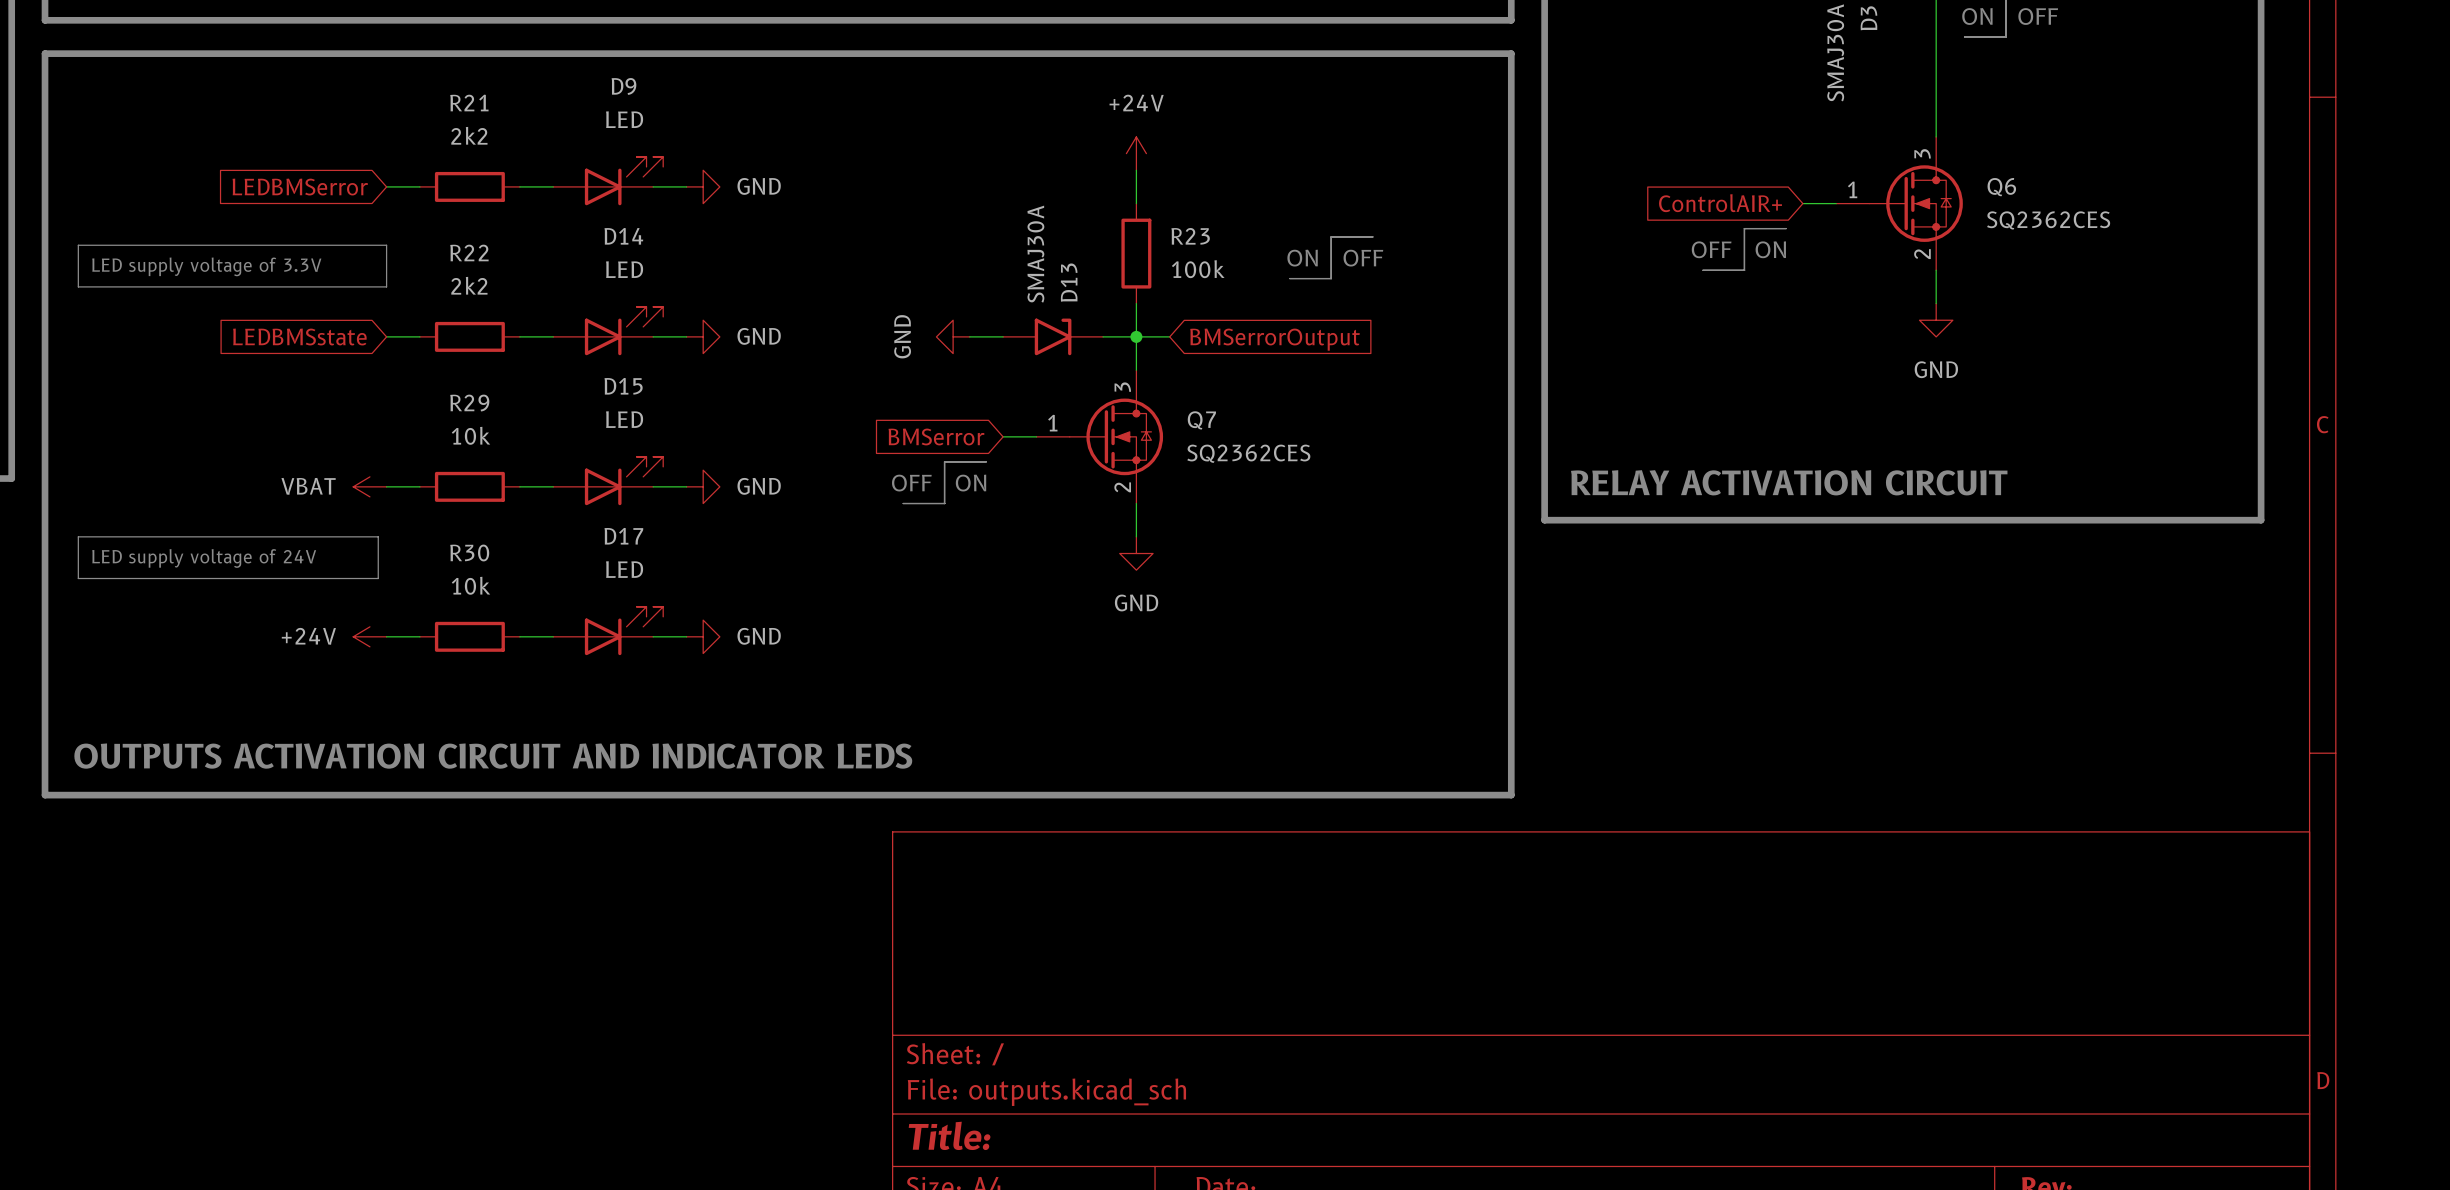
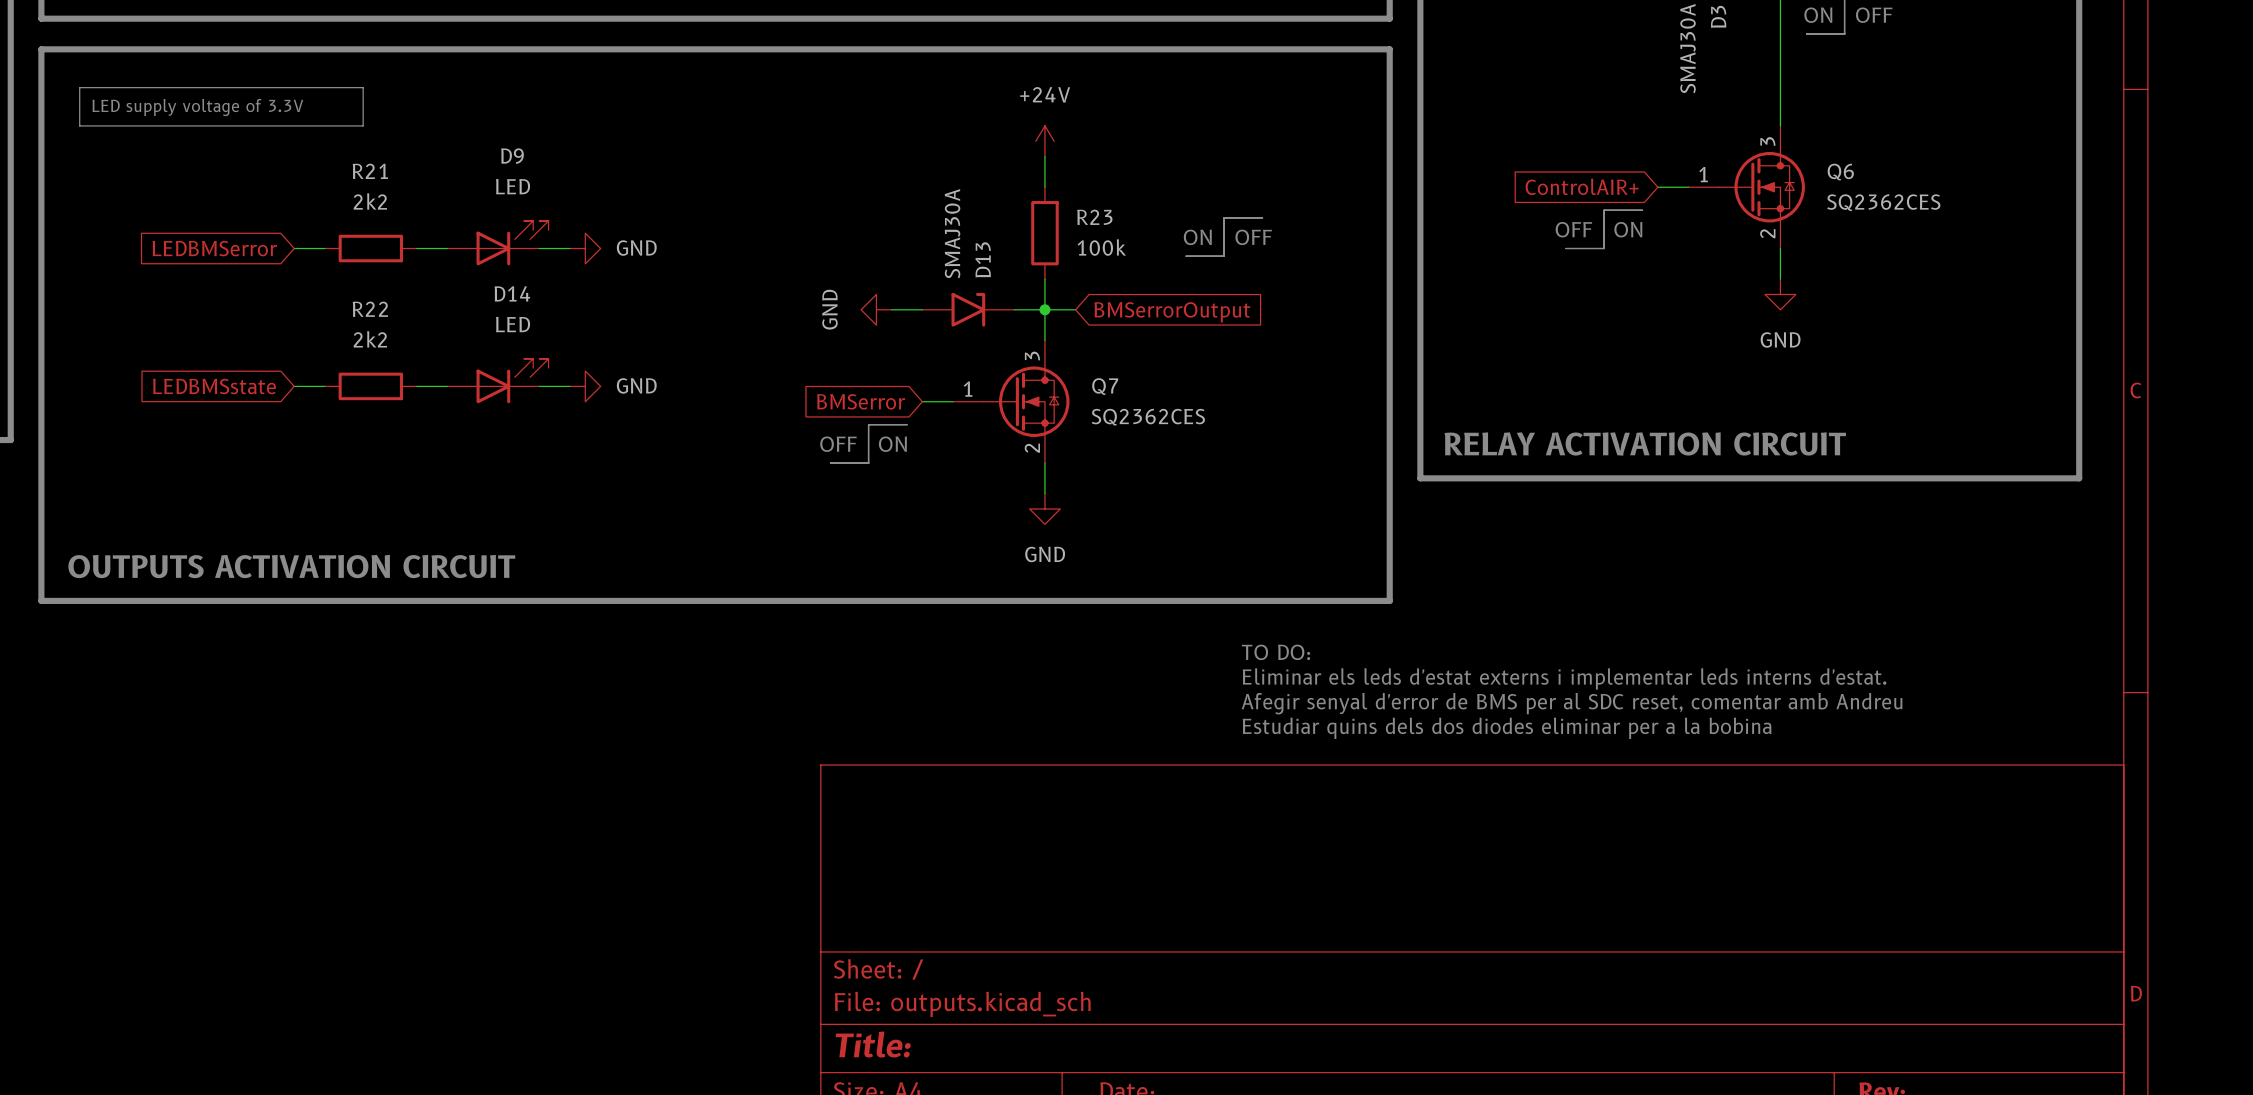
D9 position: (608, 181) -> (497, 243)
wire: (386, 186) (419, 186) -> none
R21 position: (469, 186) -> (370, 248)
wire: (519, 186) (553, 186) -> none
wire: (653, 186) (686, 186) -> none
power symbol: GND (703, 186) -> none
global label position: LEDBMSerror (300, 187) -> LEDBMSerror (214, 248)
line: (78, 245) (386, 245) (386, 286) (78, 286) (78, 245) -> (79, 87) (363, 87) (363, 125) (79, 125) (79, 87)
text position: LED supply voltage of 3.3V (206, 266) -> LED supply voltage of 3.3V (197, 107)
power symbol: none -> GND (585, 248)
D14 position: (608, 331) -> (497, 381)
global label position: LEDBMSstate (299, 336) -> LEDBMSstate (214, 386)
wire: (386, 336) (419, 336) -> (294, 248) (324, 248)
R22 position: (469, 336) -> (370, 386)
wire: (519, 336) (553, 336) -> (416, 248) (447, 248)
wire: (653, 336) (686, 336) -> (539, 248) (570, 248)
power symbol: GND (703, 336) -> none
power symbol: none -> GND (585, 386)
D15: LED (608, 481) -> none
power symbol: VBAT (369, 486) -> none
wire: (386, 486) (419, 486) -> (294, 386) (324, 386)
R29: 10k (469, 486) -> none
wire: (519, 486) (553, 486) -> (416, 386) (447, 386)
wire: (653, 486) (686, 486) -> (539, 386) (570, 386)
power symbol: GND (703, 486) -> none
line: (78, 536) (78, 578) (378, 578) (378, 536) (78, 536) -> none
text: LED supply voltage of 24V (204, 558) -> none
text: none -> OUTPUTS ACTIVATION CIRCUIT (291, 566)
D17: LED (608, 630) -> none
power symbol: +24V (369, 636) -> none
wire: (386, 636) (419, 636) -> none
R30: 10k (469, 636) -> none
wire: (519, 636) (553, 636) -> none
wire: (653, 636) (686, 636) -> none
power symbol: GND (703, 636) -> none
line: (45, 653) (45, 795) (1511, 795) (1511, 653) -> (41, 600) (1389, 600)
text: none -> TO DO: (1276, 652)
text: none -> Eliminar els leds d'estat externs i implementar leds interns d'estat. (1564, 678)
text: OUTPUTS ACTIVATION CIRCUIT AND INDICATOR LEDS (493, 756) -> none
text: none -> Afegir senyal d'error de BMS per al SDC reset, comentar amb Andreu (1572, 703)
text: none -> Estudiar quins dels dos diodes eliminar per a la bobina (1507, 728)

